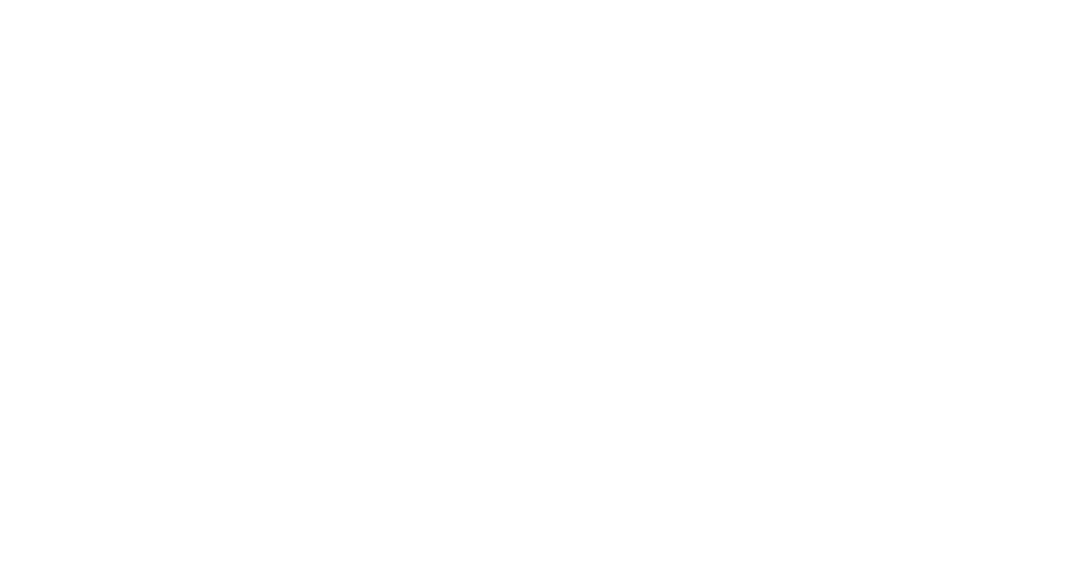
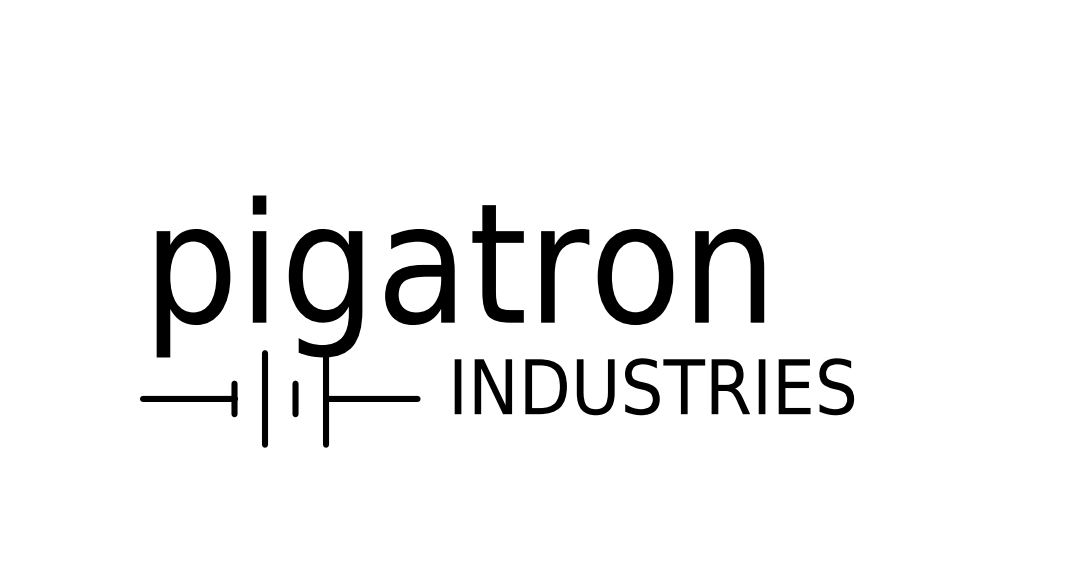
drawing: none -> [139, 350, 421, 448]

